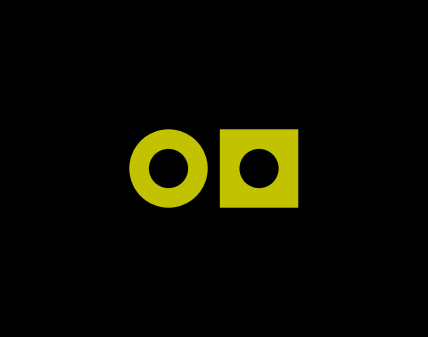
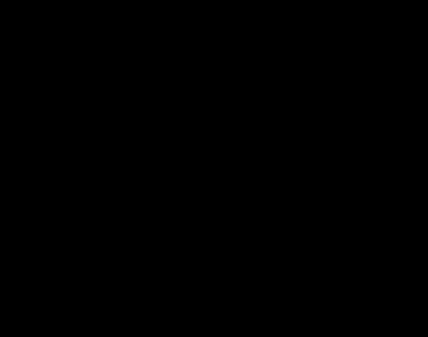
part: (213, 168) -> none

